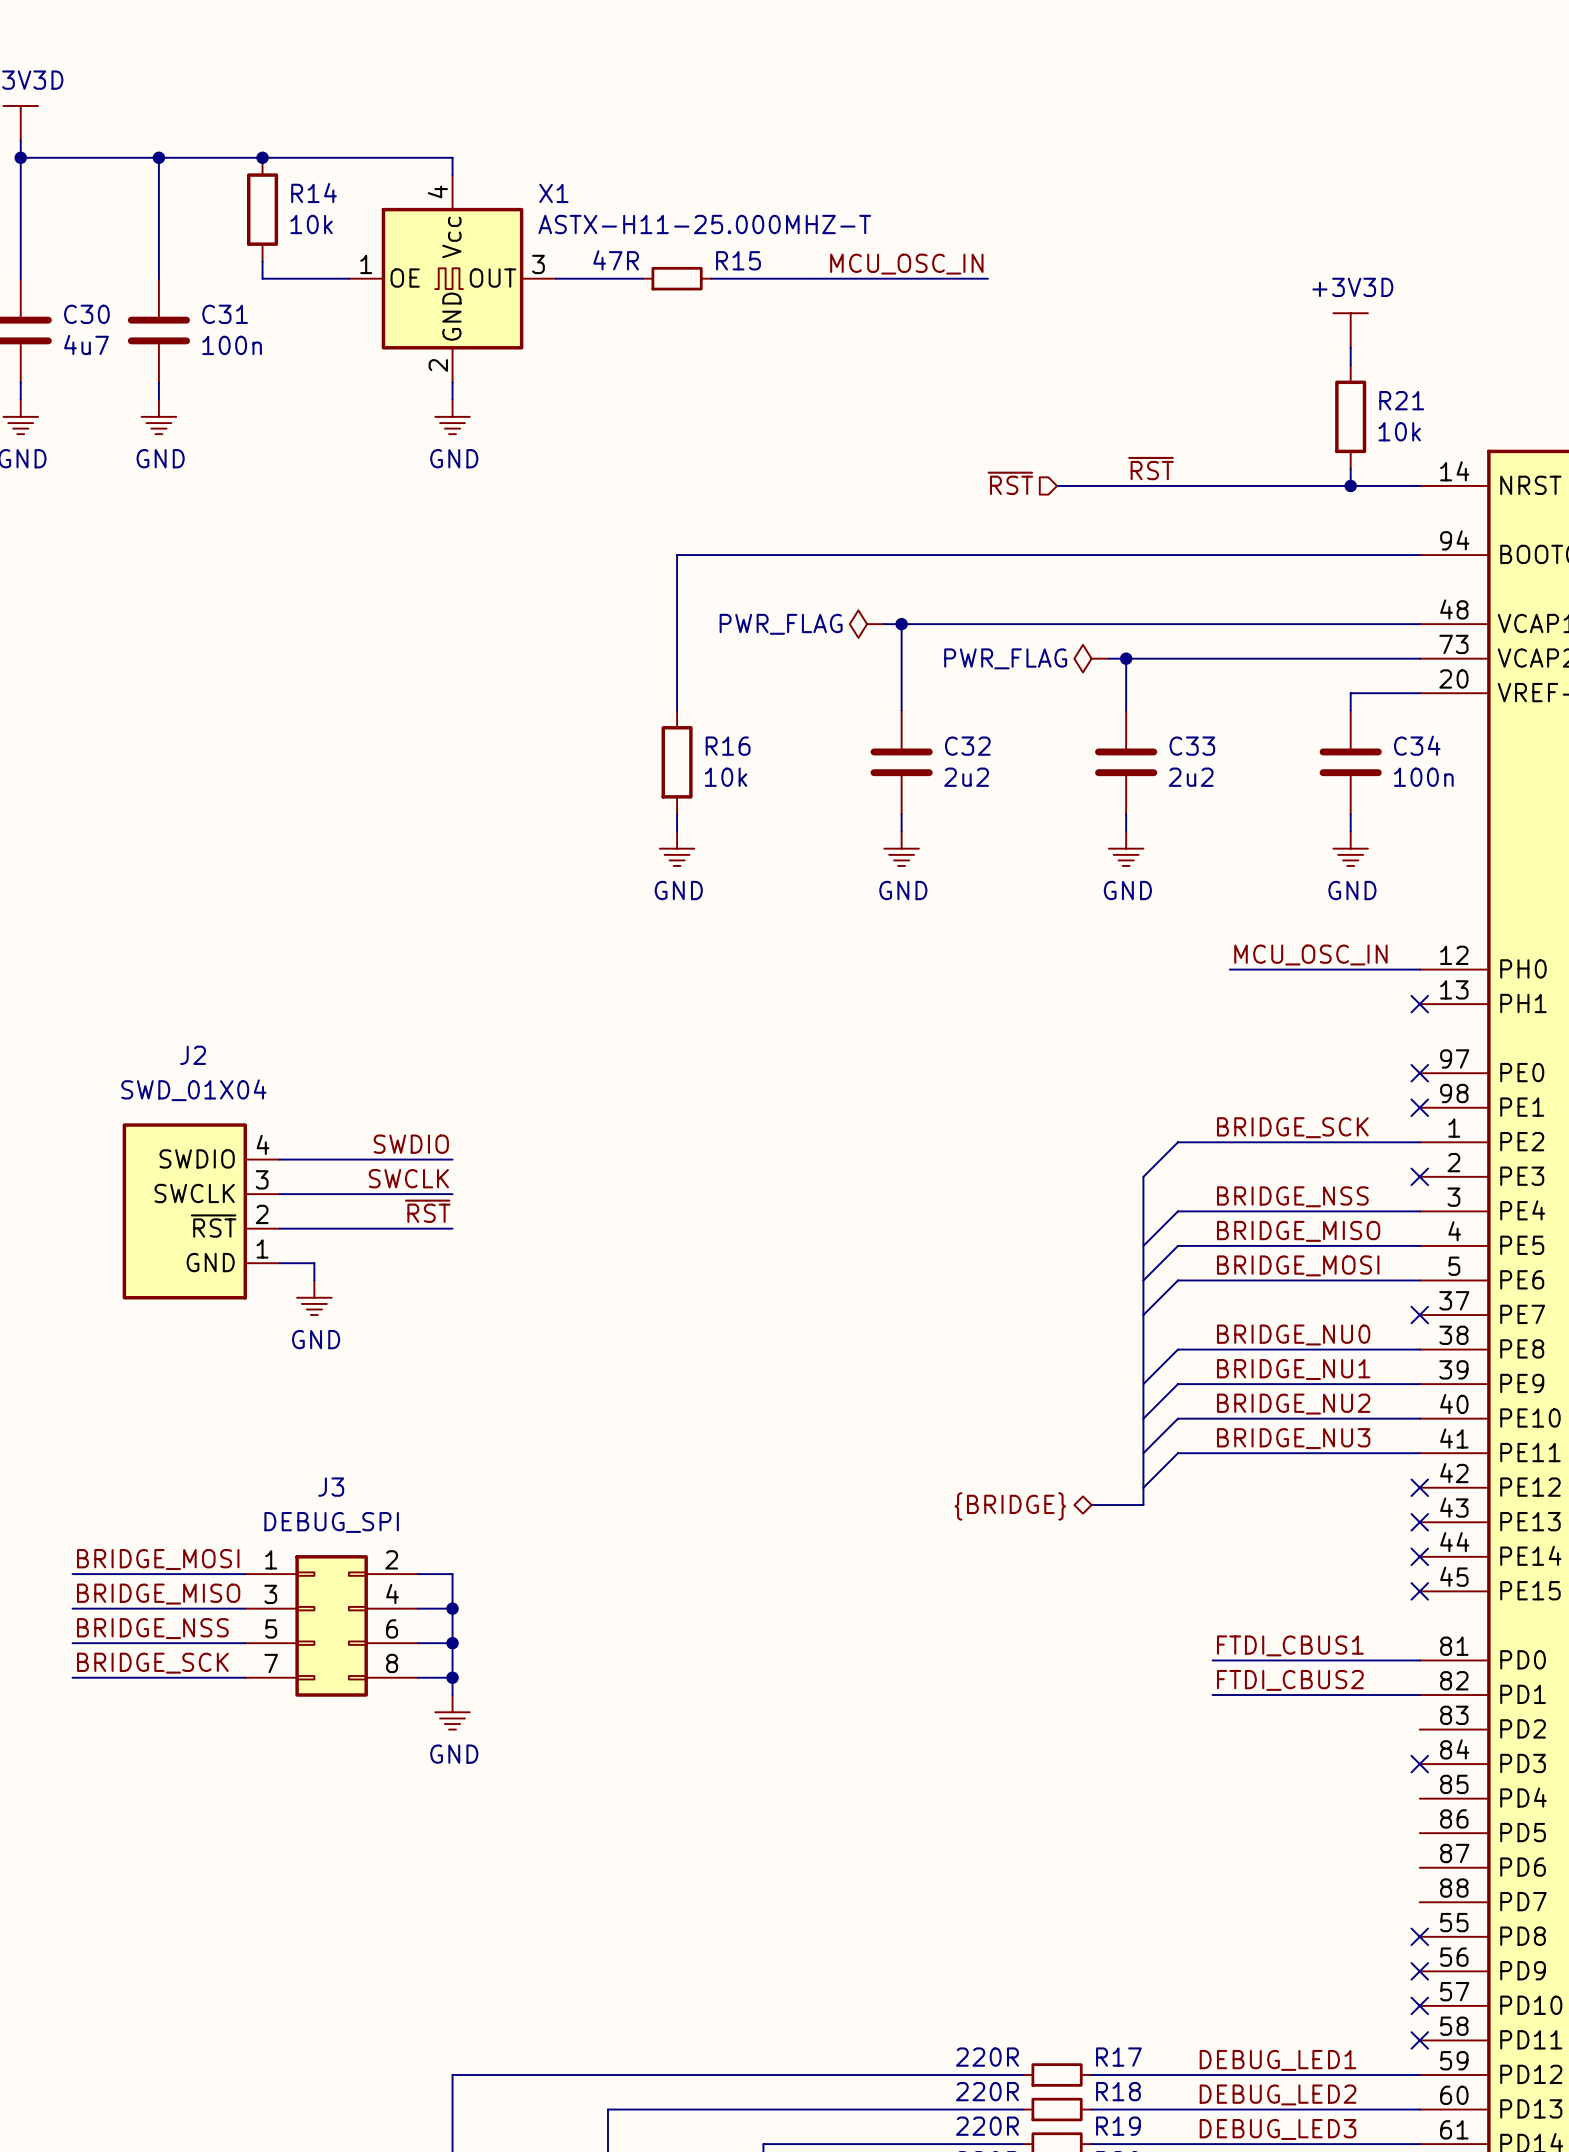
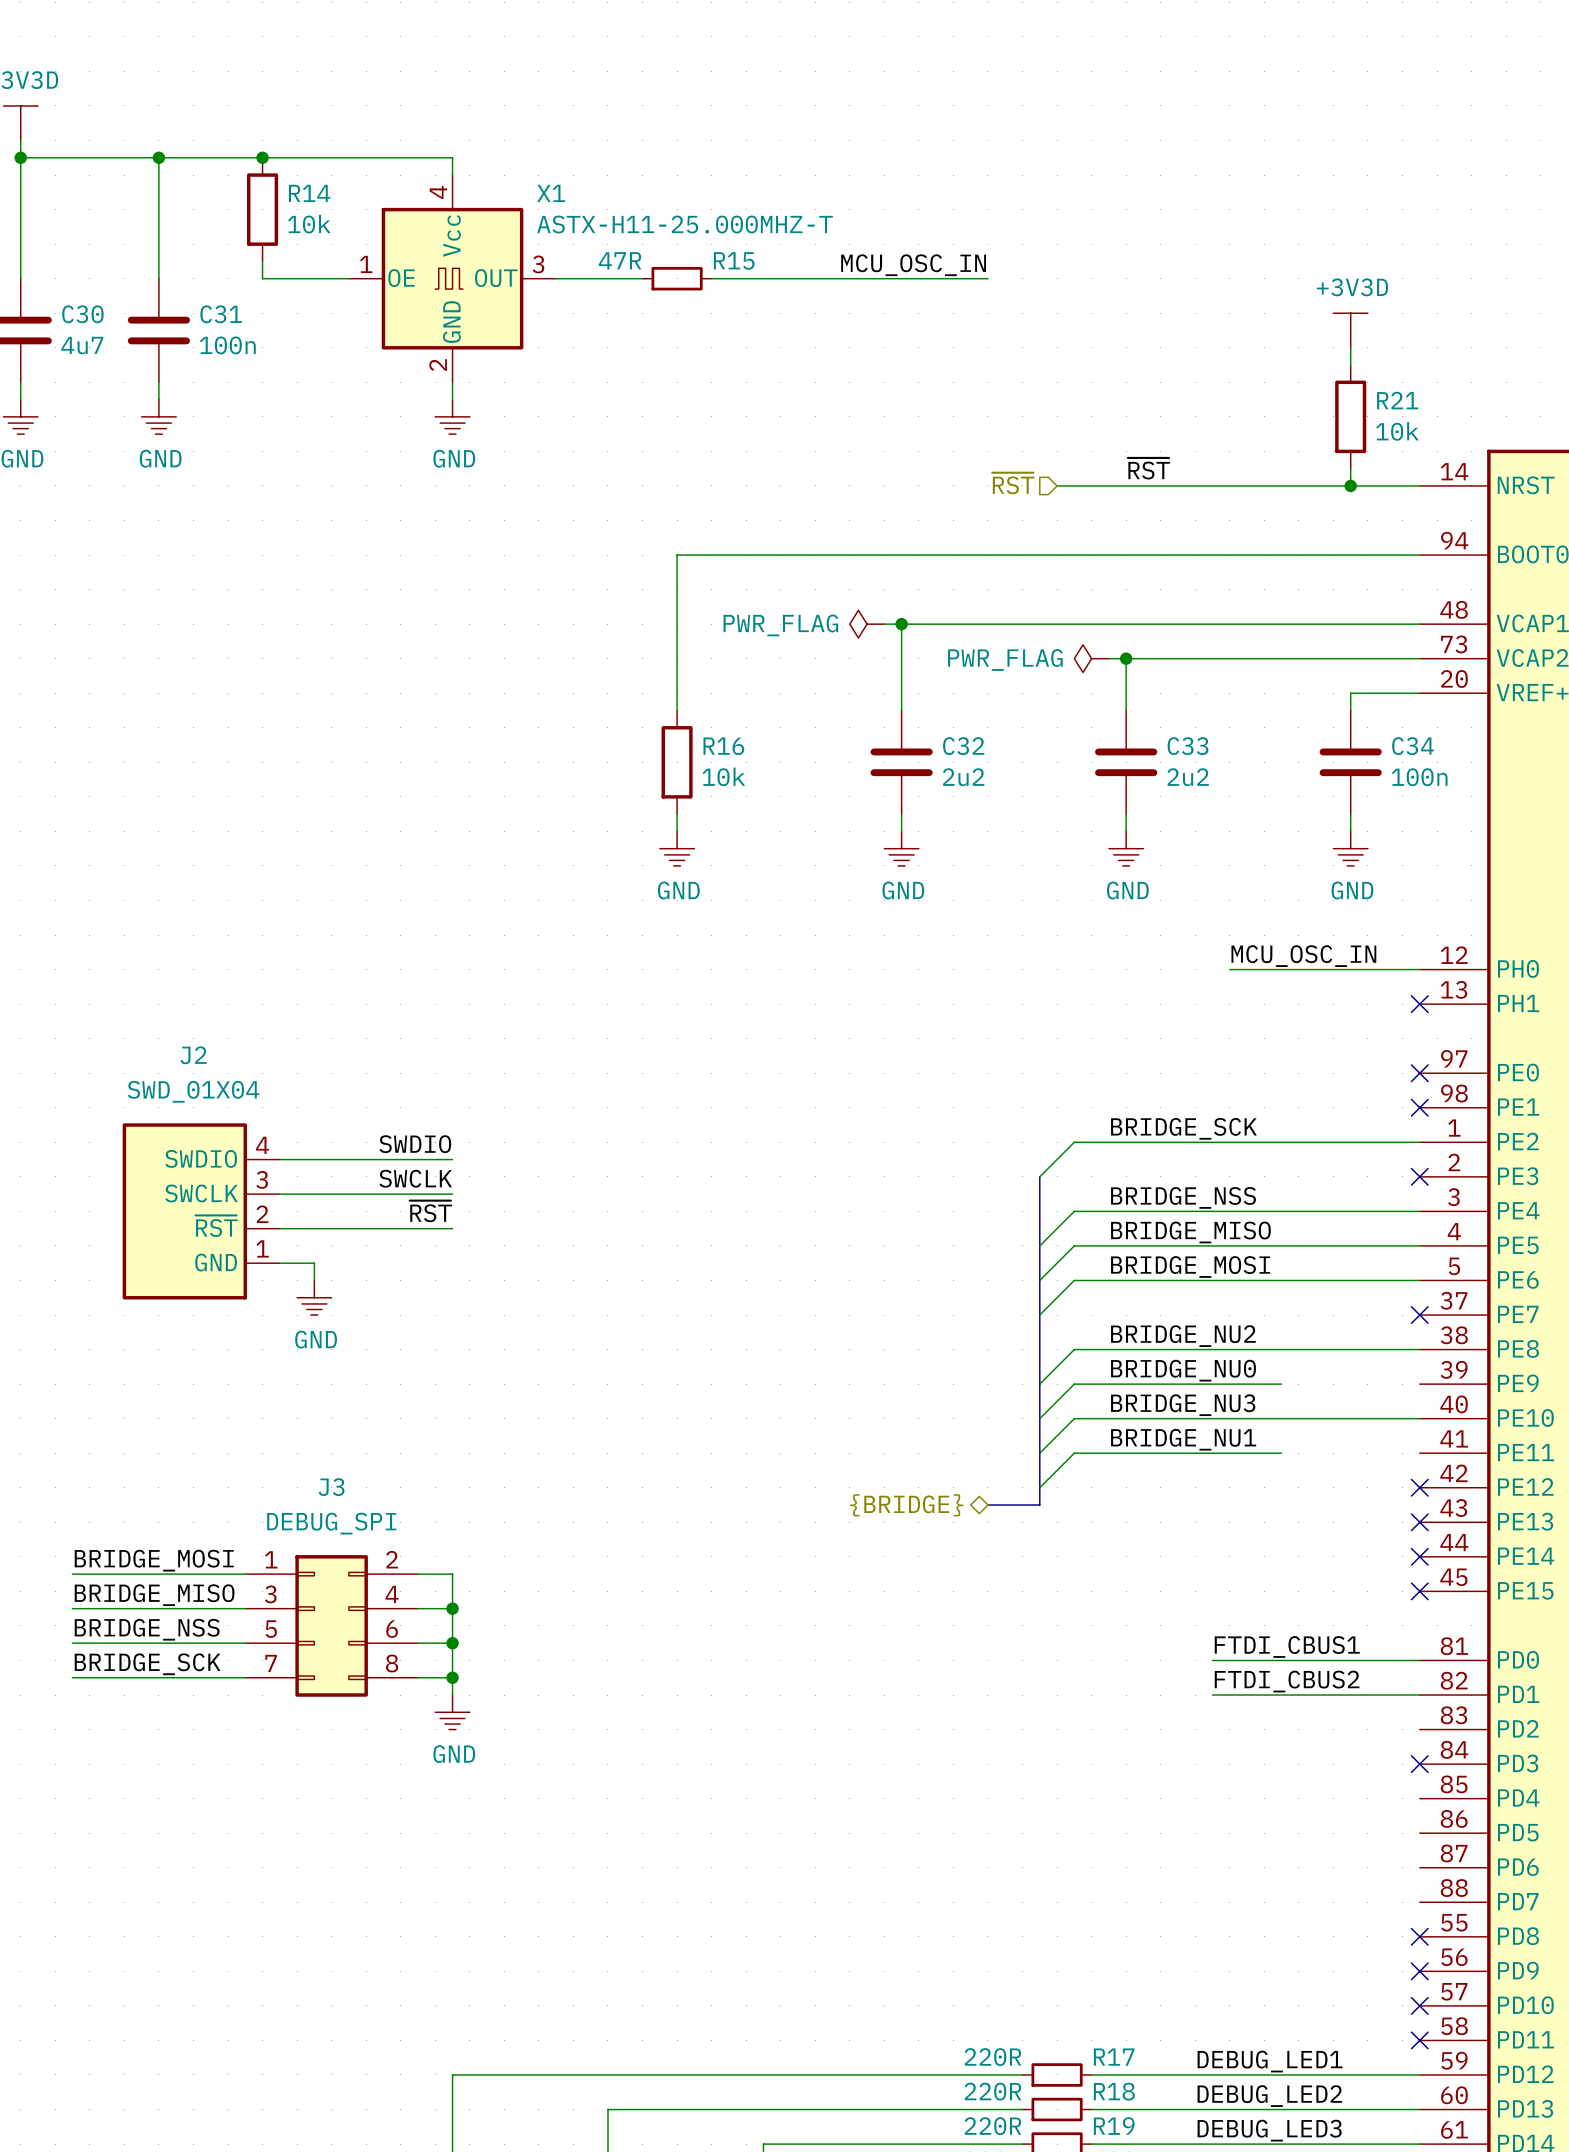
label position: BRIDGE_SCK (1292, 1127) -> BRIDGE_SCK (1183, 1128)
wire: (1177, 1142) (1143, 1176) -> (1177, 1142) (1074, 1142) (1039, 1176)
bus: (1143, 1176) (1143, 1505) (1091, 1505) -> (1039, 1176) (1039, 1505) (987, 1505)
label position: BRIDGE_NSS (1292, 1196) -> BRIDGE_NSS (1183, 1197)
wire: (1177, 1211) (1143, 1245) -> (1177, 1211) (1074, 1211) (1039, 1245)
label position: BRIDGE_MISO (1298, 1231) -> BRIDGE_MISO (1190, 1232)
wire: (1177, 1245) (1143, 1280) -> (1177, 1245) (1074, 1245) (1039, 1280)
label position: BRIDGE_MOSI (1298, 1265) -> BRIDGE_MOSI (1190, 1267)
wire: (1177, 1280) (1143, 1315) -> (1177, 1280) (1074, 1280) (1039, 1315)
label position: BRIDGE_NU0 (1293, 1334) -> BRIDGE_NU0 (1183, 1370)
wire: (1177, 1349) (1143, 1384) -> (1177, 1349) (1074, 1349) (1039, 1384)
label position: BRIDGE_NU1 (1293, 1369) -> BRIDGE_NU1 (1183, 1439)
wire: (1177, 1384) (1143, 1418) -> (1177, 1384) (1074, 1384) (1039, 1418)
wire: (1281, 1384) (1419, 1384) -> none
label position: BRIDGE_NU2 (1293, 1404) -> BRIDGE_NU2 (1183, 1336)
wire: (1177, 1418) (1143, 1453) -> (1177, 1418) (1074, 1418) (1039, 1453)
label position: BRIDGE_NU3 (1293, 1438) -> BRIDGE_NU3 (1183, 1405)
wire: (1177, 1453) (1143, 1487) -> (1177, 1453) (1074, 1453) (1039, 1487)
wire: (1281, 1453) (1419, 1453) -> none
hierarchical label position: {BRIDGE} (1010, 1506) -> {BRIDGE} (906, 1505)

